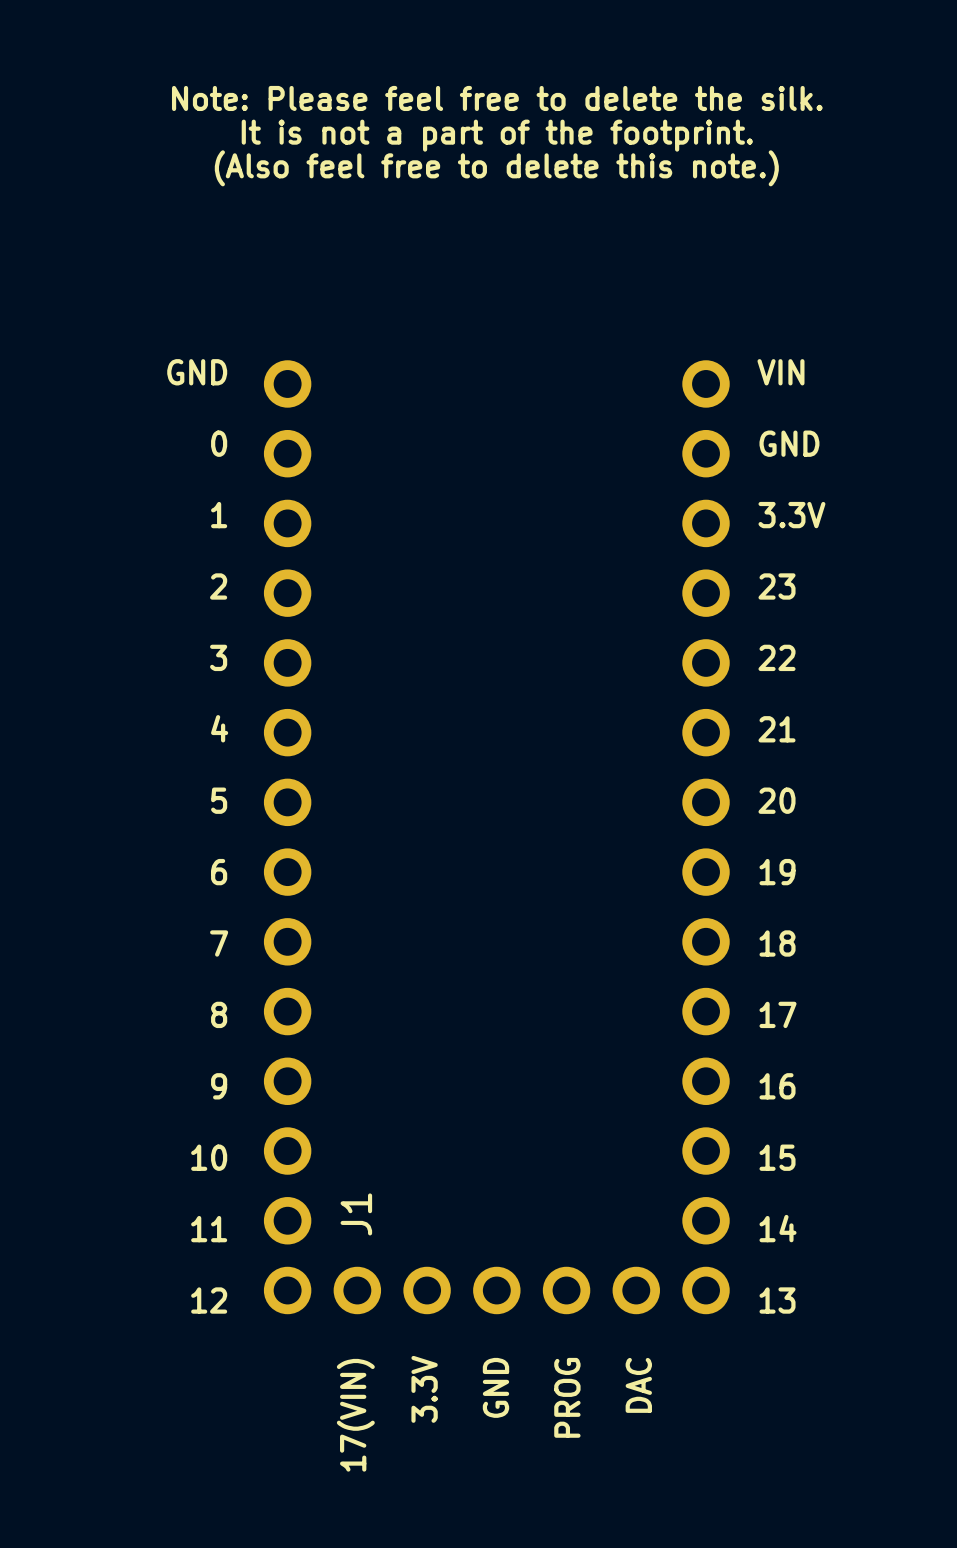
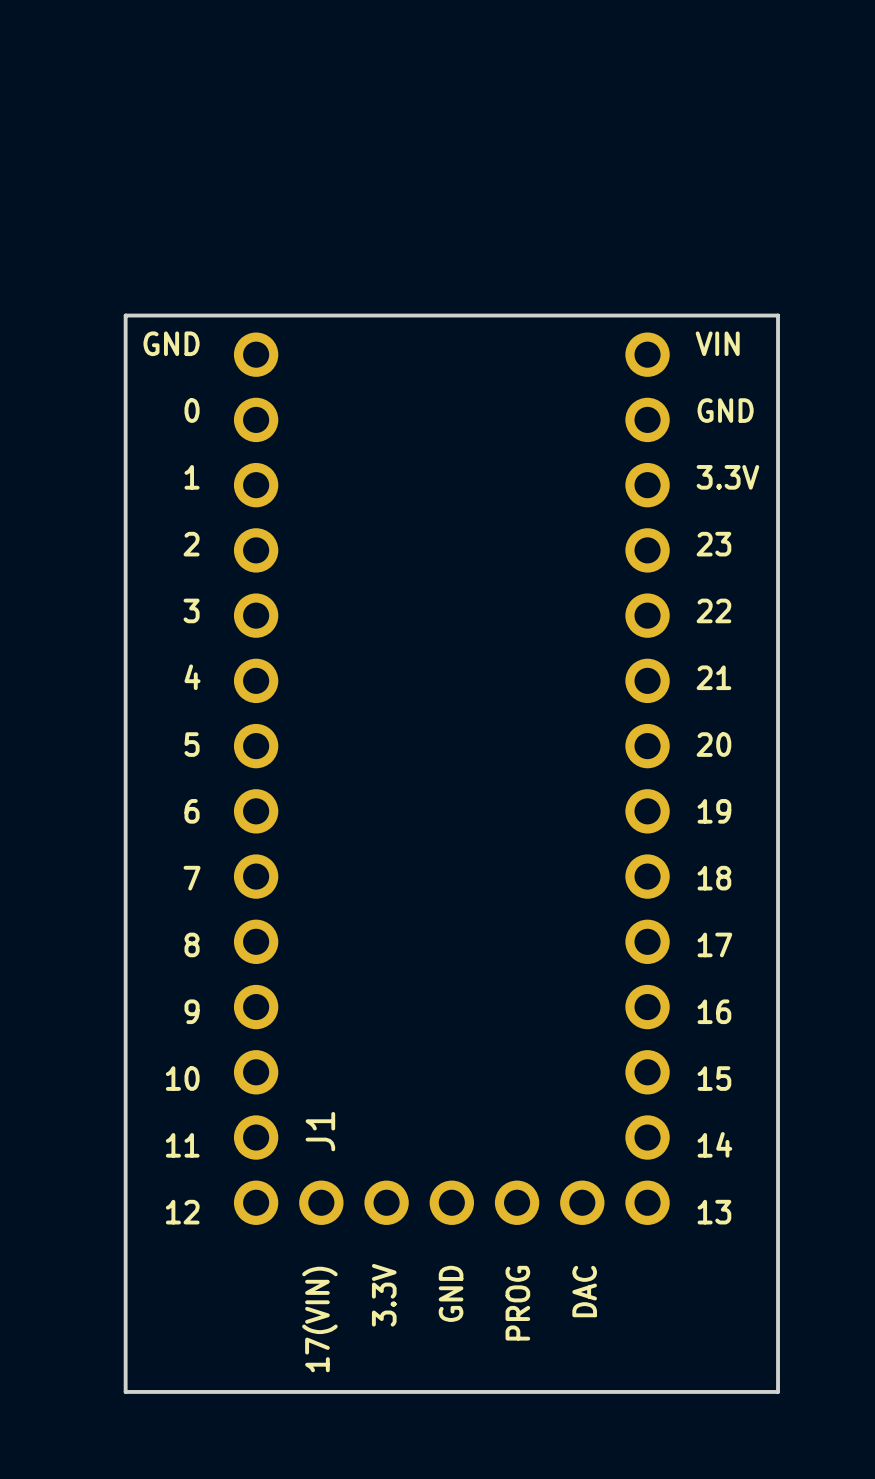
text: Note: Please feel free to delete the silk. (497, 98) -> none
text: It is not a part of the footprint. (497, 135) -> none
text: (Also feel free to delete this note.) (496, 168) -> none
board edge: none -> (125, 315) (125, 1391) (778, 1391) (778, 315) (125, 315)

